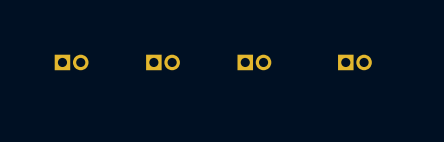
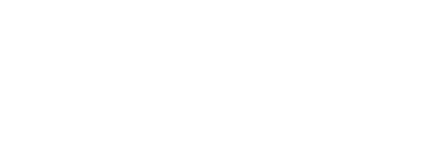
part: (71, 62) -> none
part: (163, 62) -> none
part: (254, 62) -> none
part: (354, 62) -> none

